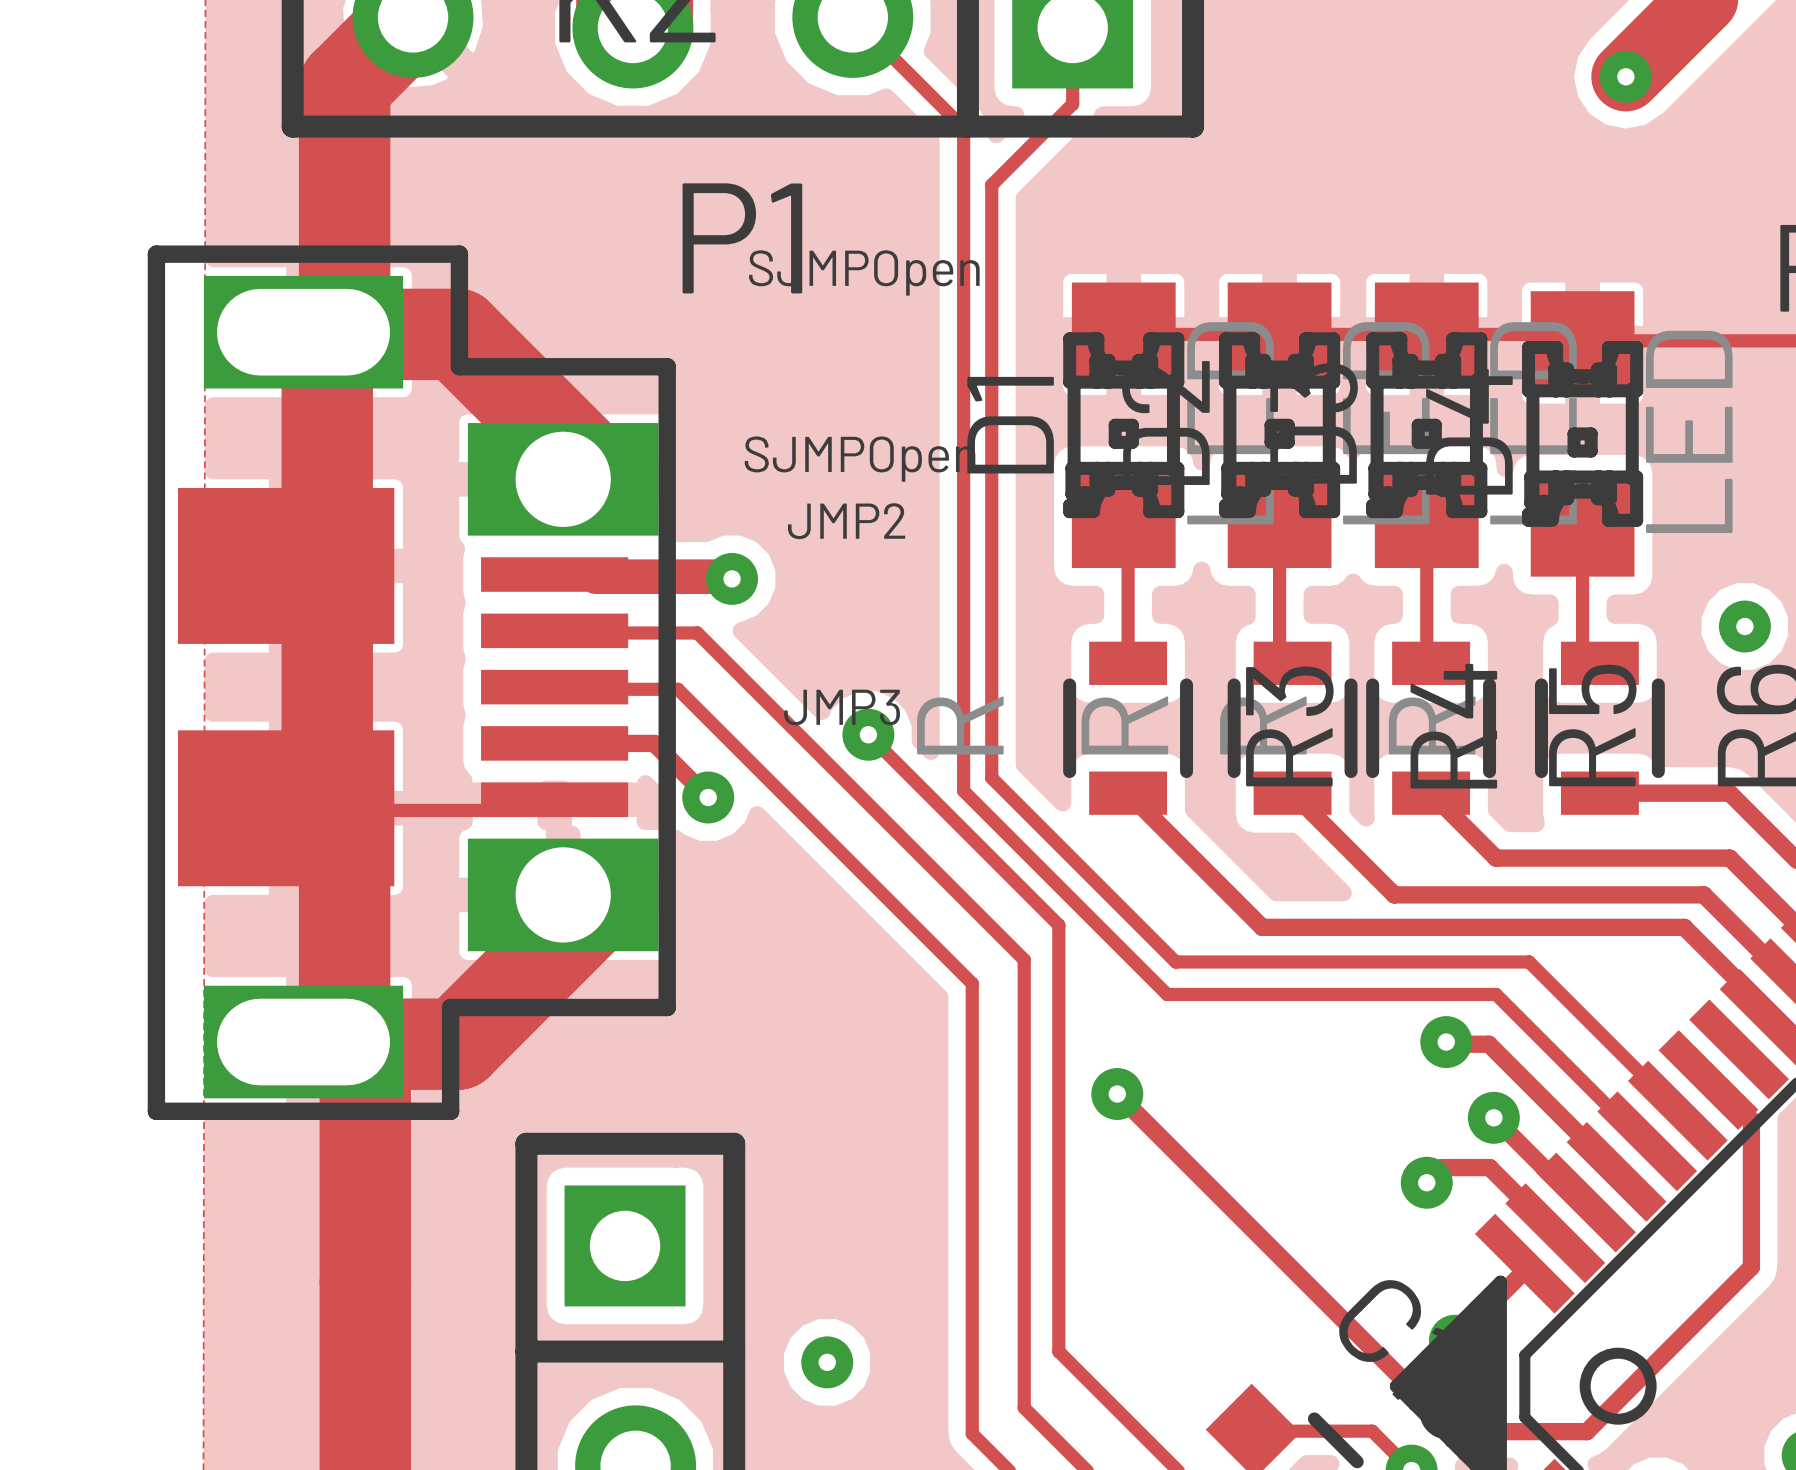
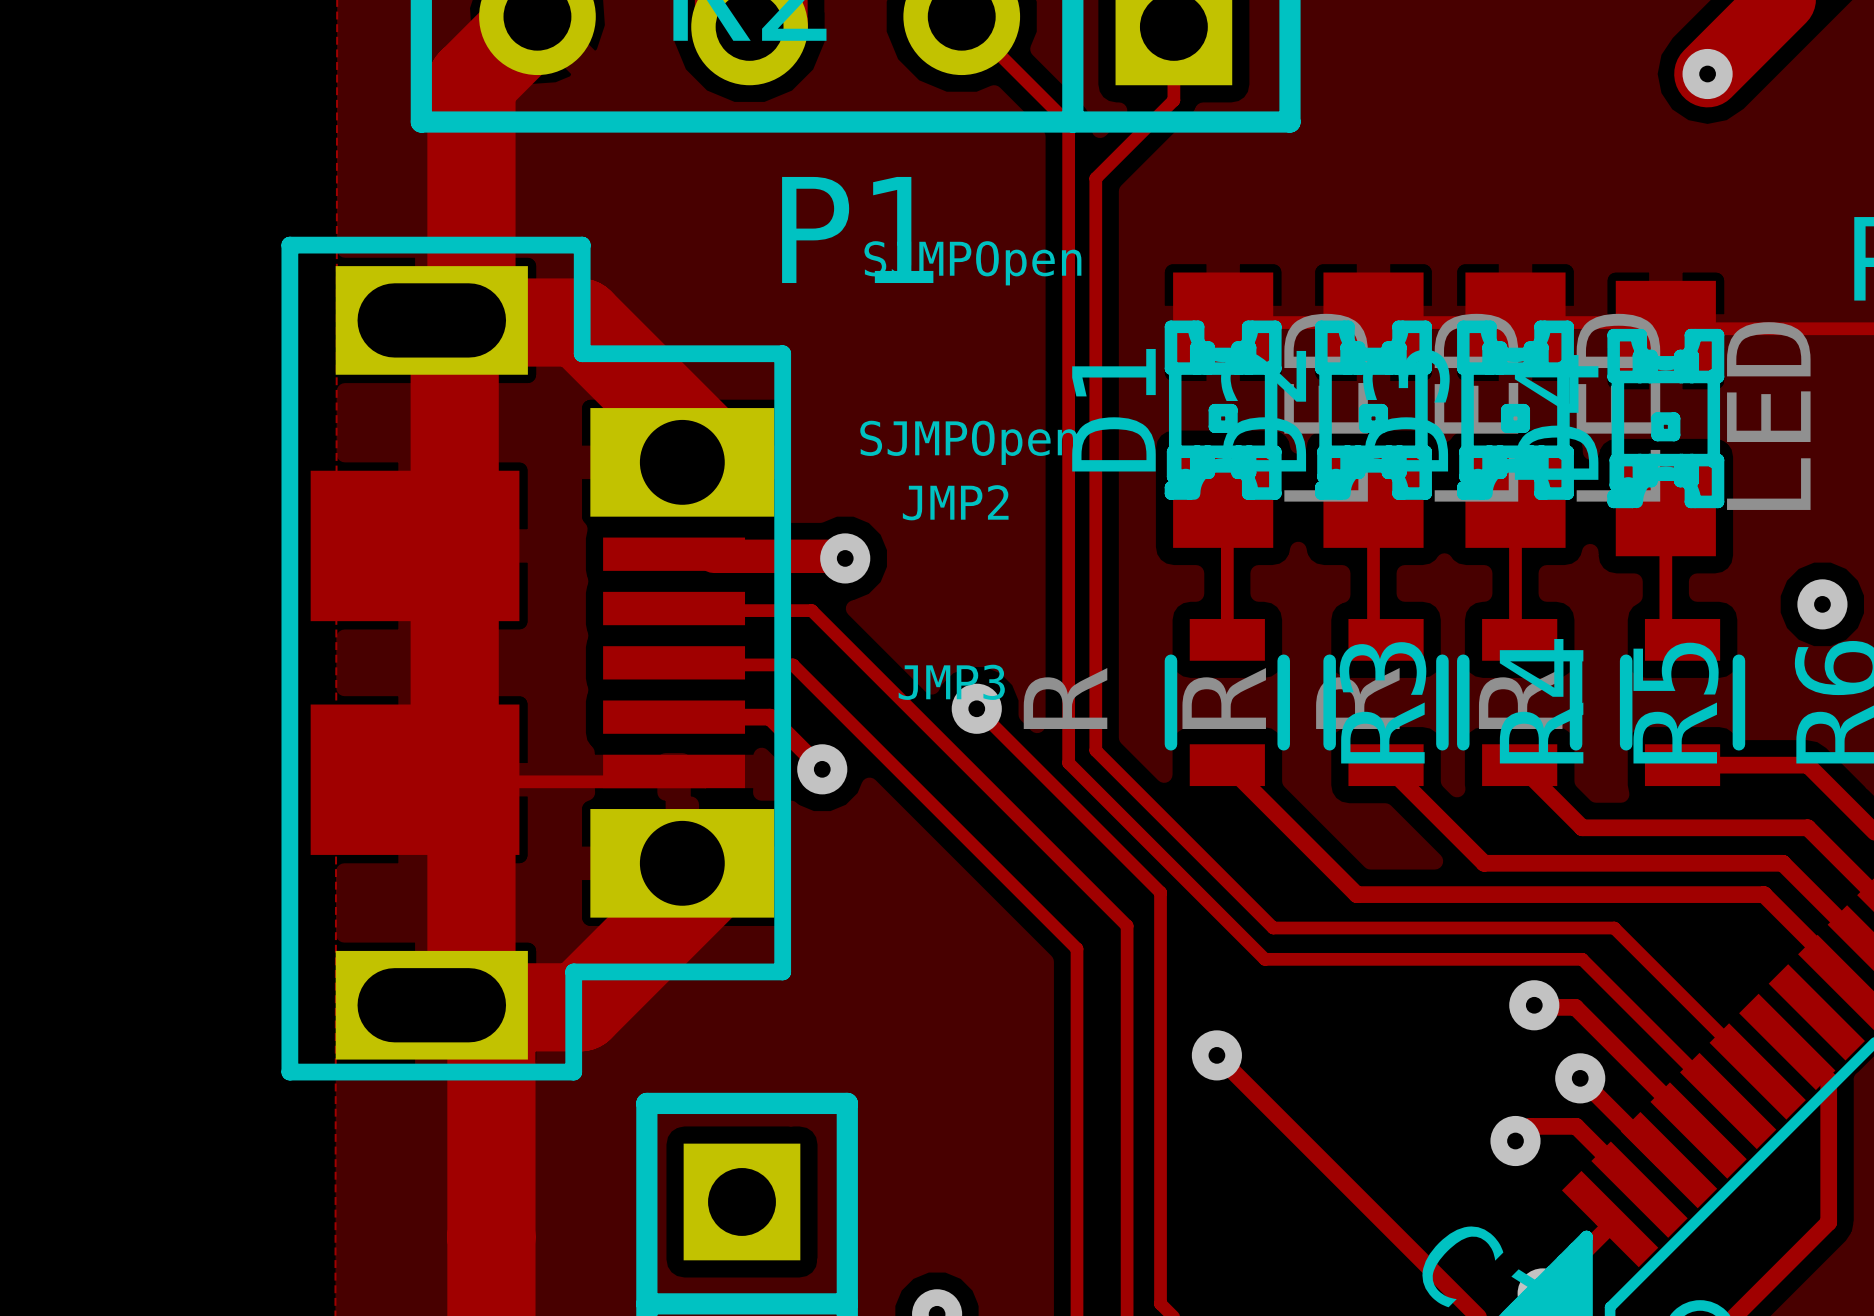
part footprint: [147, 245, 676, 1120] -> [281, 236, 792, 1081]

